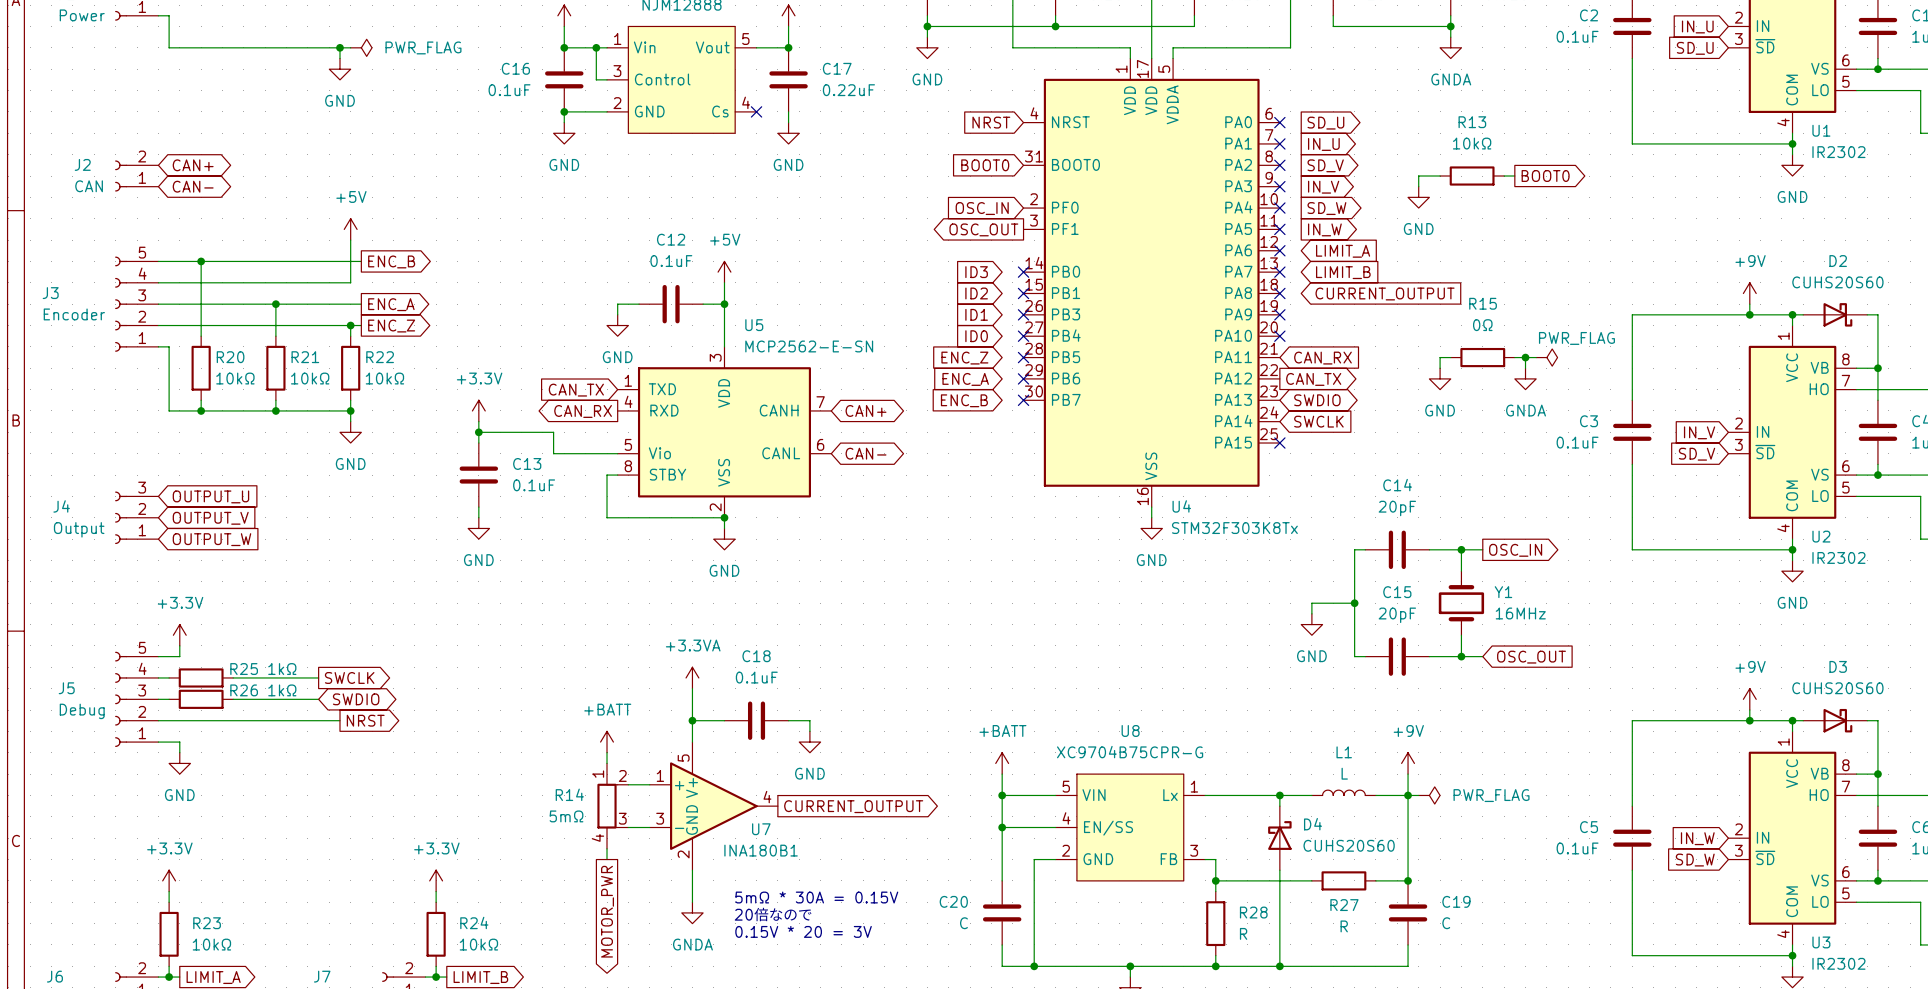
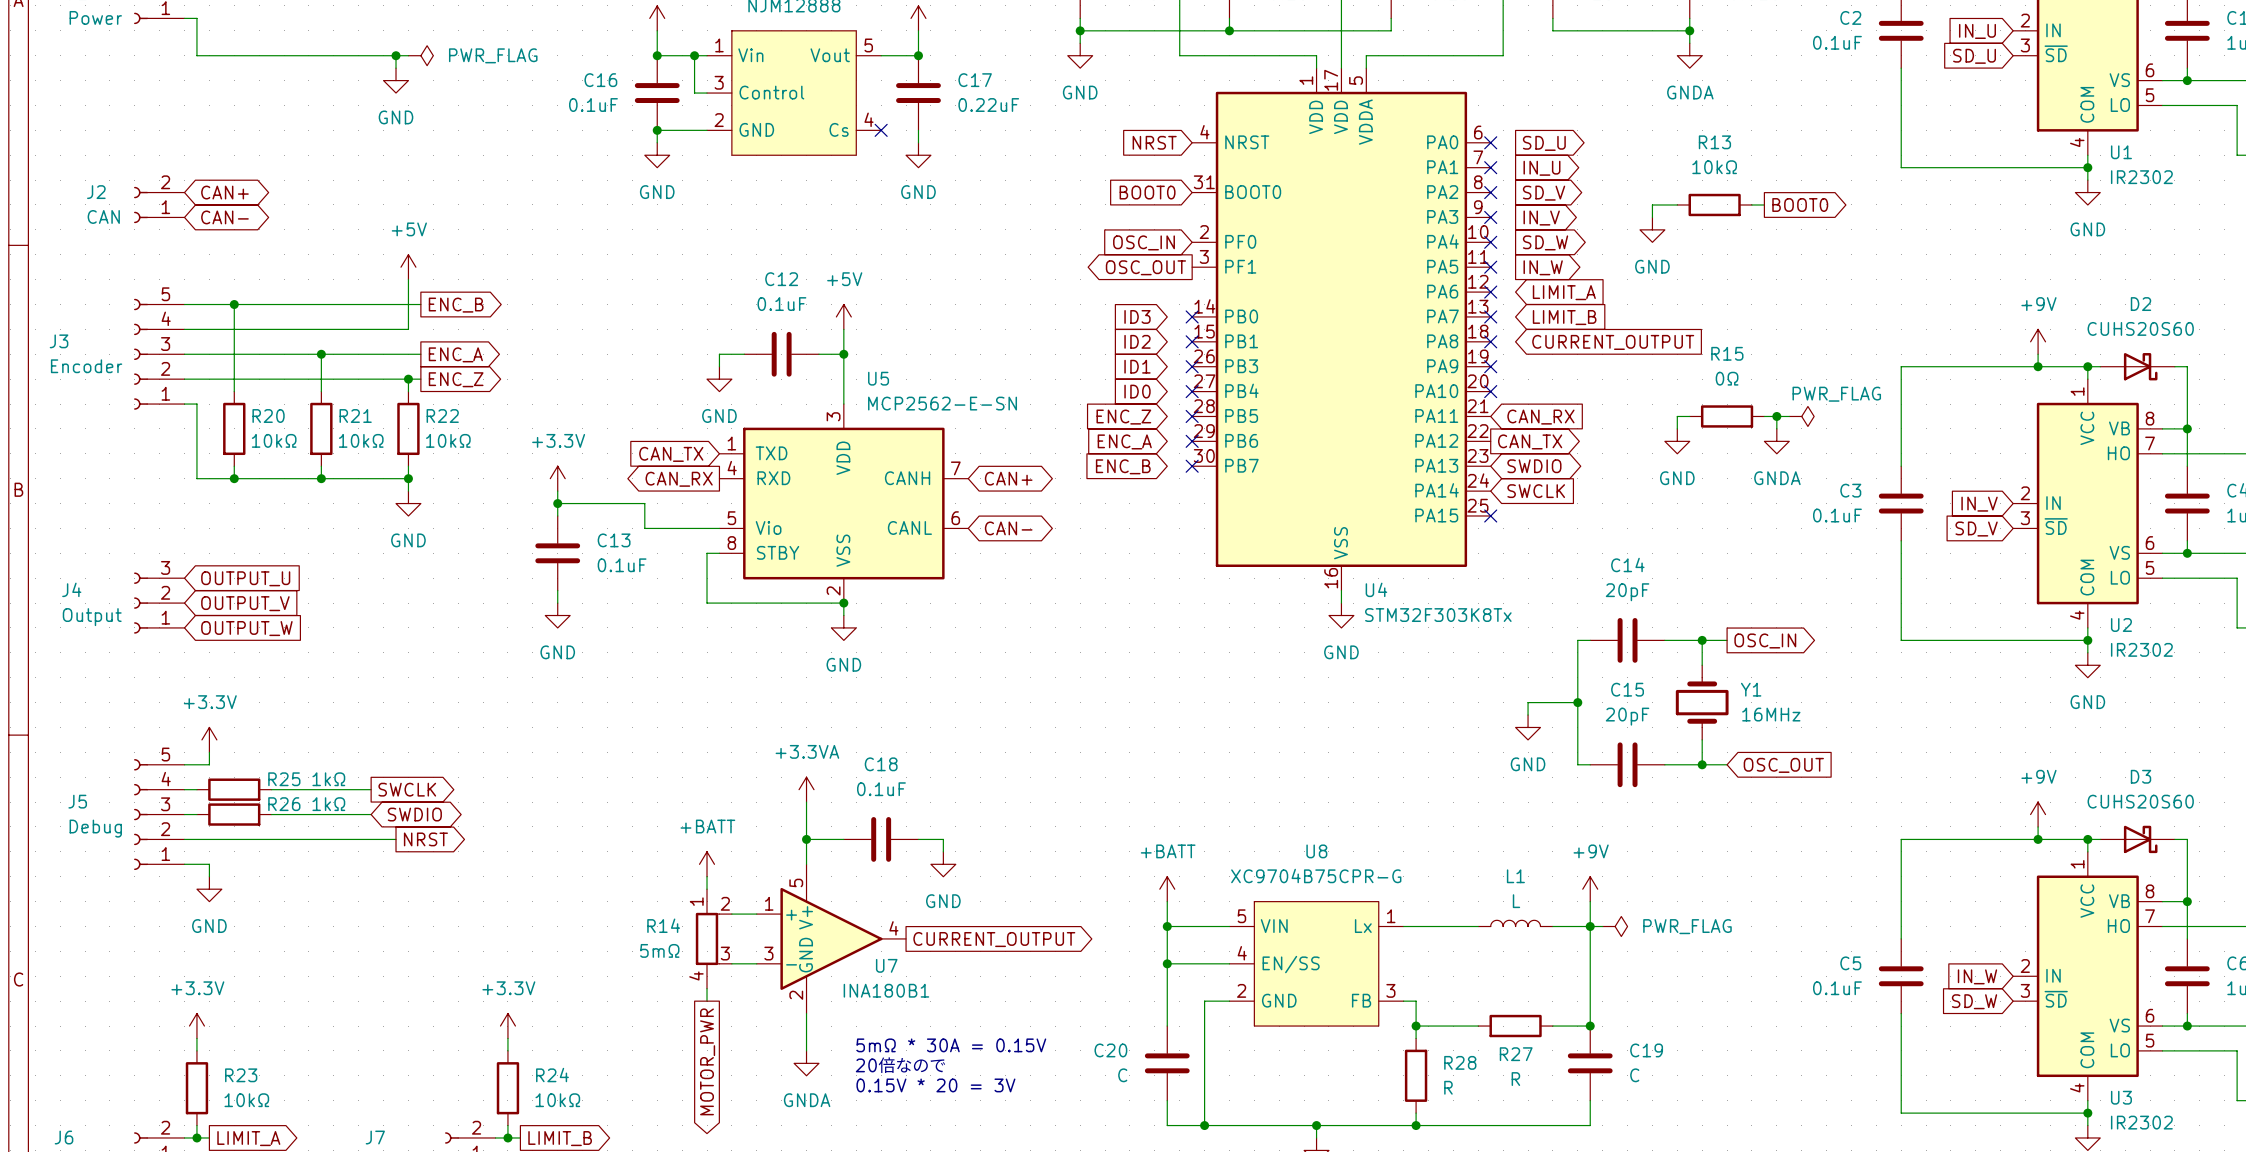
power symbol position: +9V (1408, 763) -> +9V (1590, 889)
wire: (1408, 774) (1408, 880) (1375, 880) -> (1590, 901) (1590, 1026) (1552, 1026)
L1 position: (1343, 792) -> (1515, 923)
wire: (1269, 795) (1311, 795) -> none
wire: (1279, 795) (1279, 806) -> none
junction: (1279, 795) -> none
junction: none -> (1590, 926)
wire: (1375, 795) (1418, 795) -> (1602, 926) (1552, 926)
junction: (1408, 795) -> none
power symbol position: PWR_FLAG (1429, 795) -> PWR_FLAG (1615, 926)
D4: CUHS20S60 (1279, 838) -> none
wire: (1279, 870) (1279, 966) -> none
wire: (1269, 880) (1311, 880) -> none
R27 position: (1343, 880) -> (1515, 1026)
junction position: (1408, 880) -> (1590, 1026)
C19 position: (1408, 912) -> (1590, 1063)
wire: (1408, 944) (1408, 966) (1365, 966) -> (1590, 1100) (1590, 1125)
junction: (1279, 966) -> none

